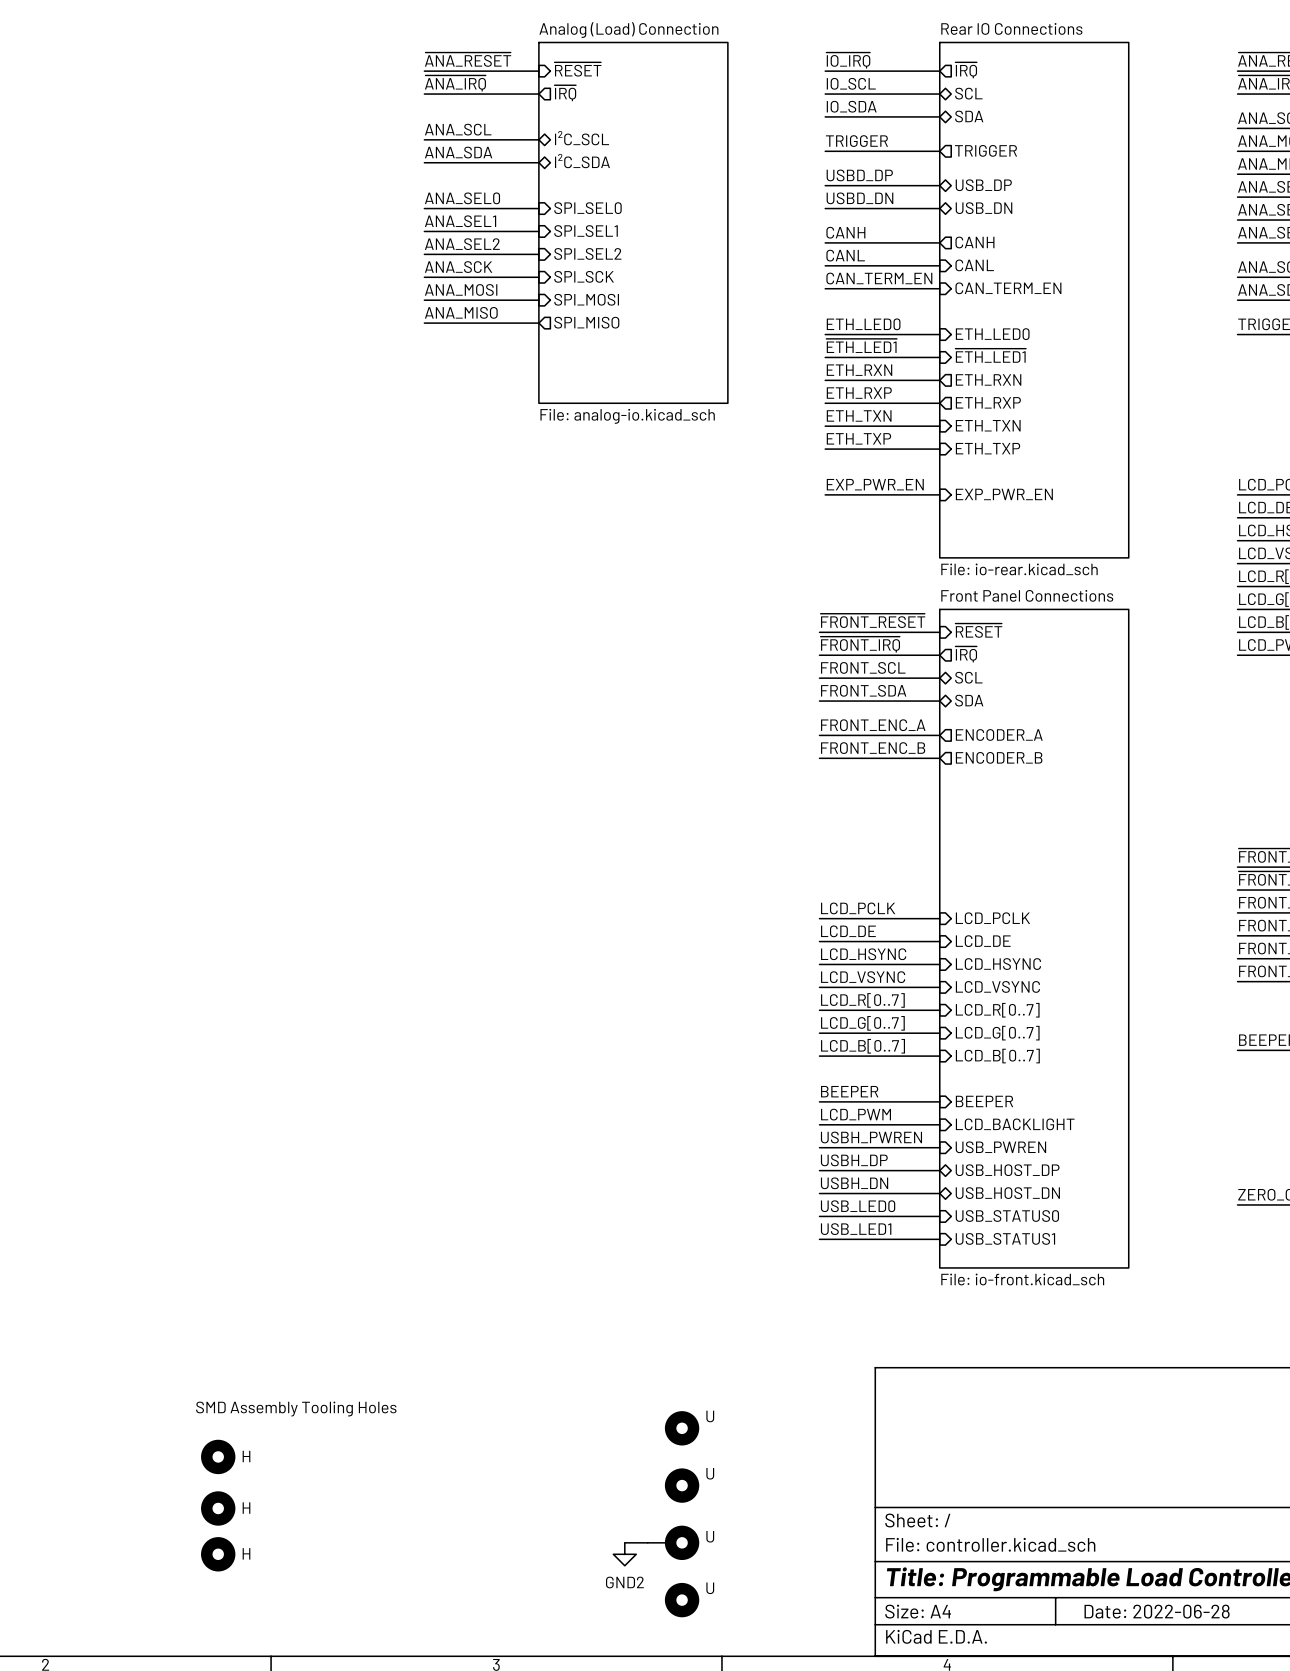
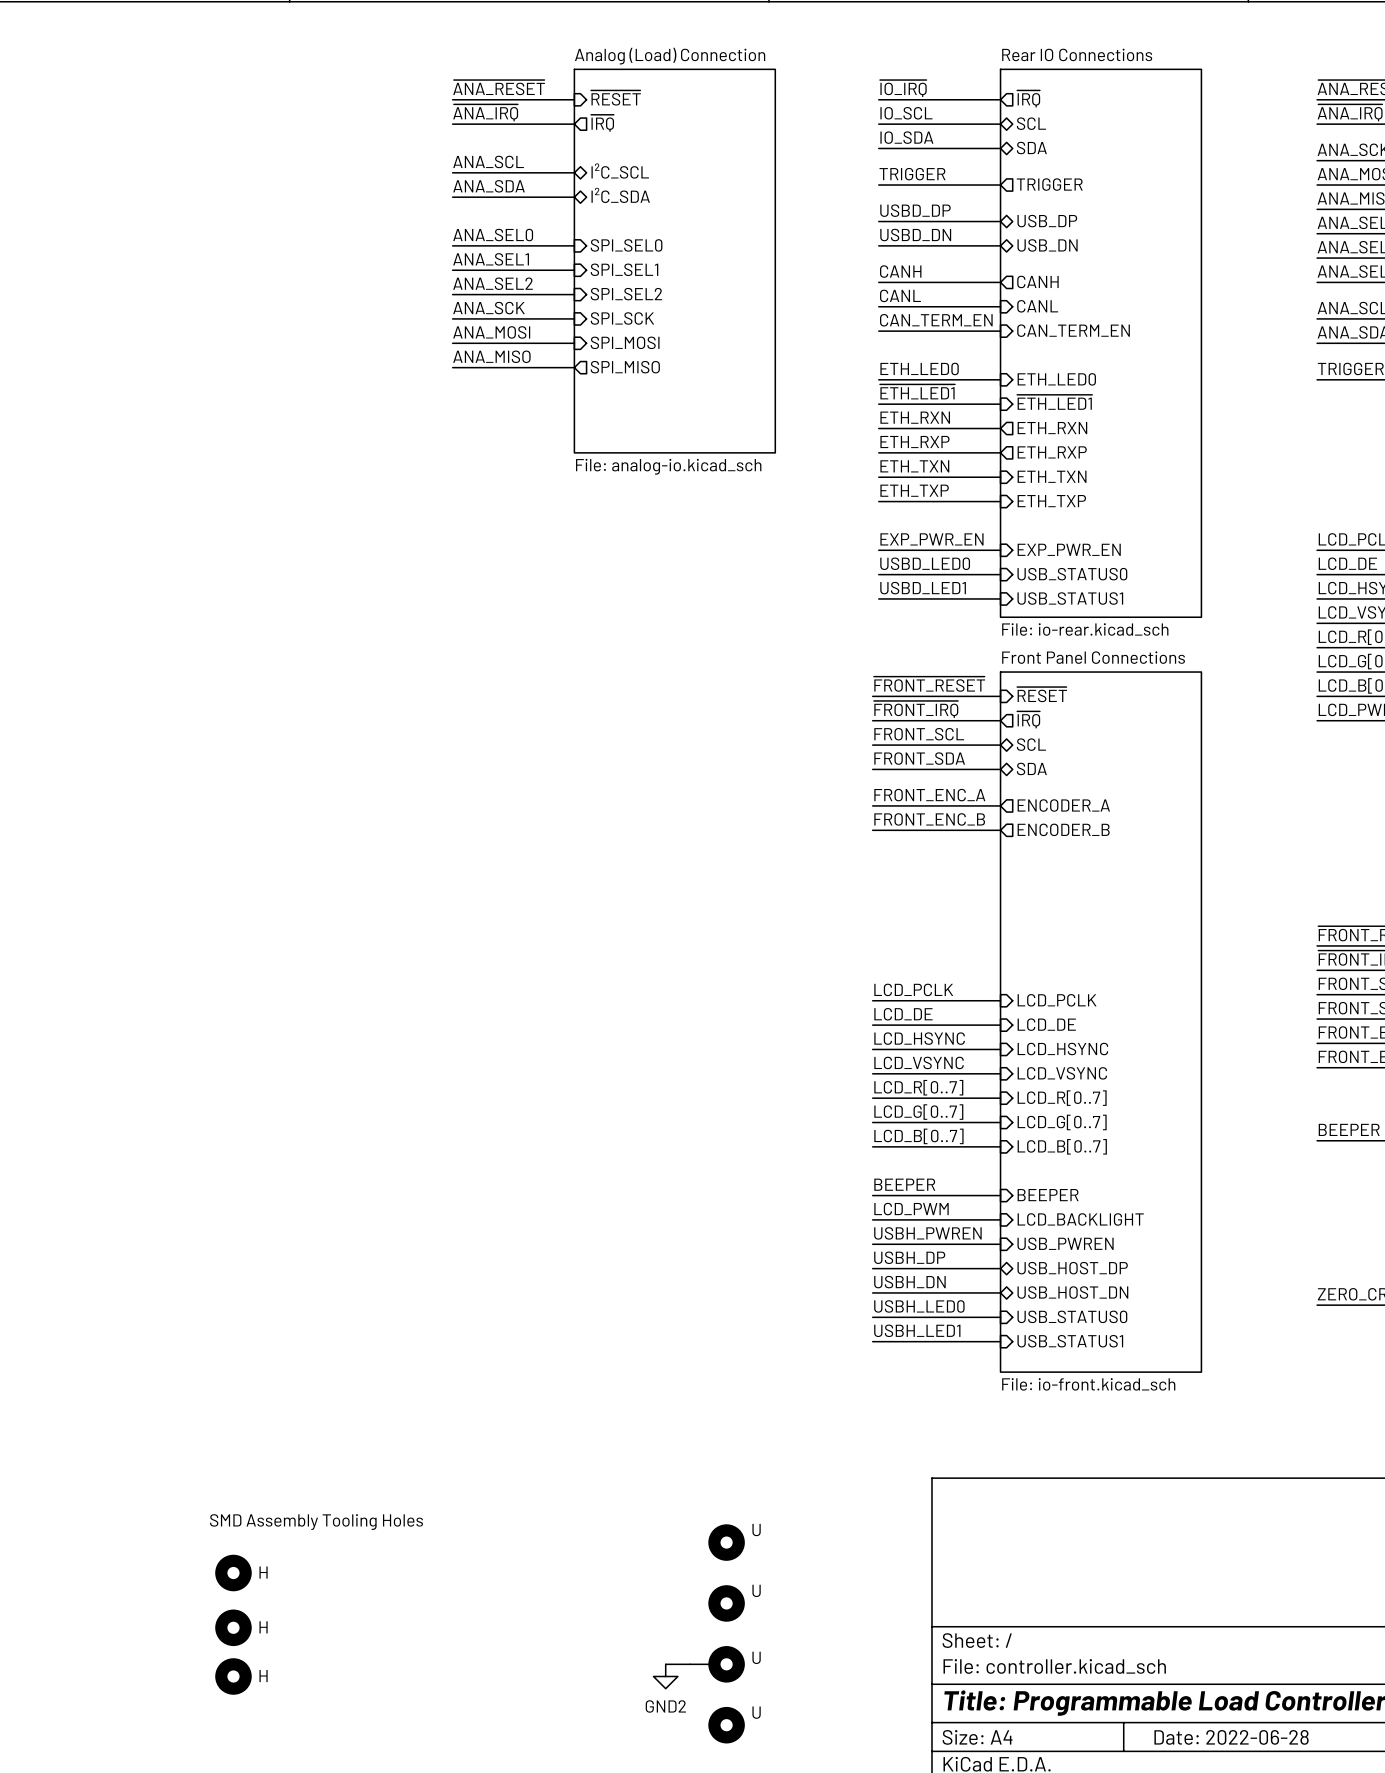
label: none -> USBD_LED0 (925, 563)
wire: none -> (878, 574) (1000, 574)
sheet pin: none -> USB_STATUS0 (1072, 574)
label: none -> USBD_LED1 (923, 588)
wire: none -> (878, 598) (1000, 598)
sheet pin: none -> USB_STATUS1 (1070, 598)
label: USB_LED0 (858, 1206) -> USBH_LED0 (919, 1306)
label: USB_LED1 (856, 1229) -> USBH_LED1 (917, 1330)

